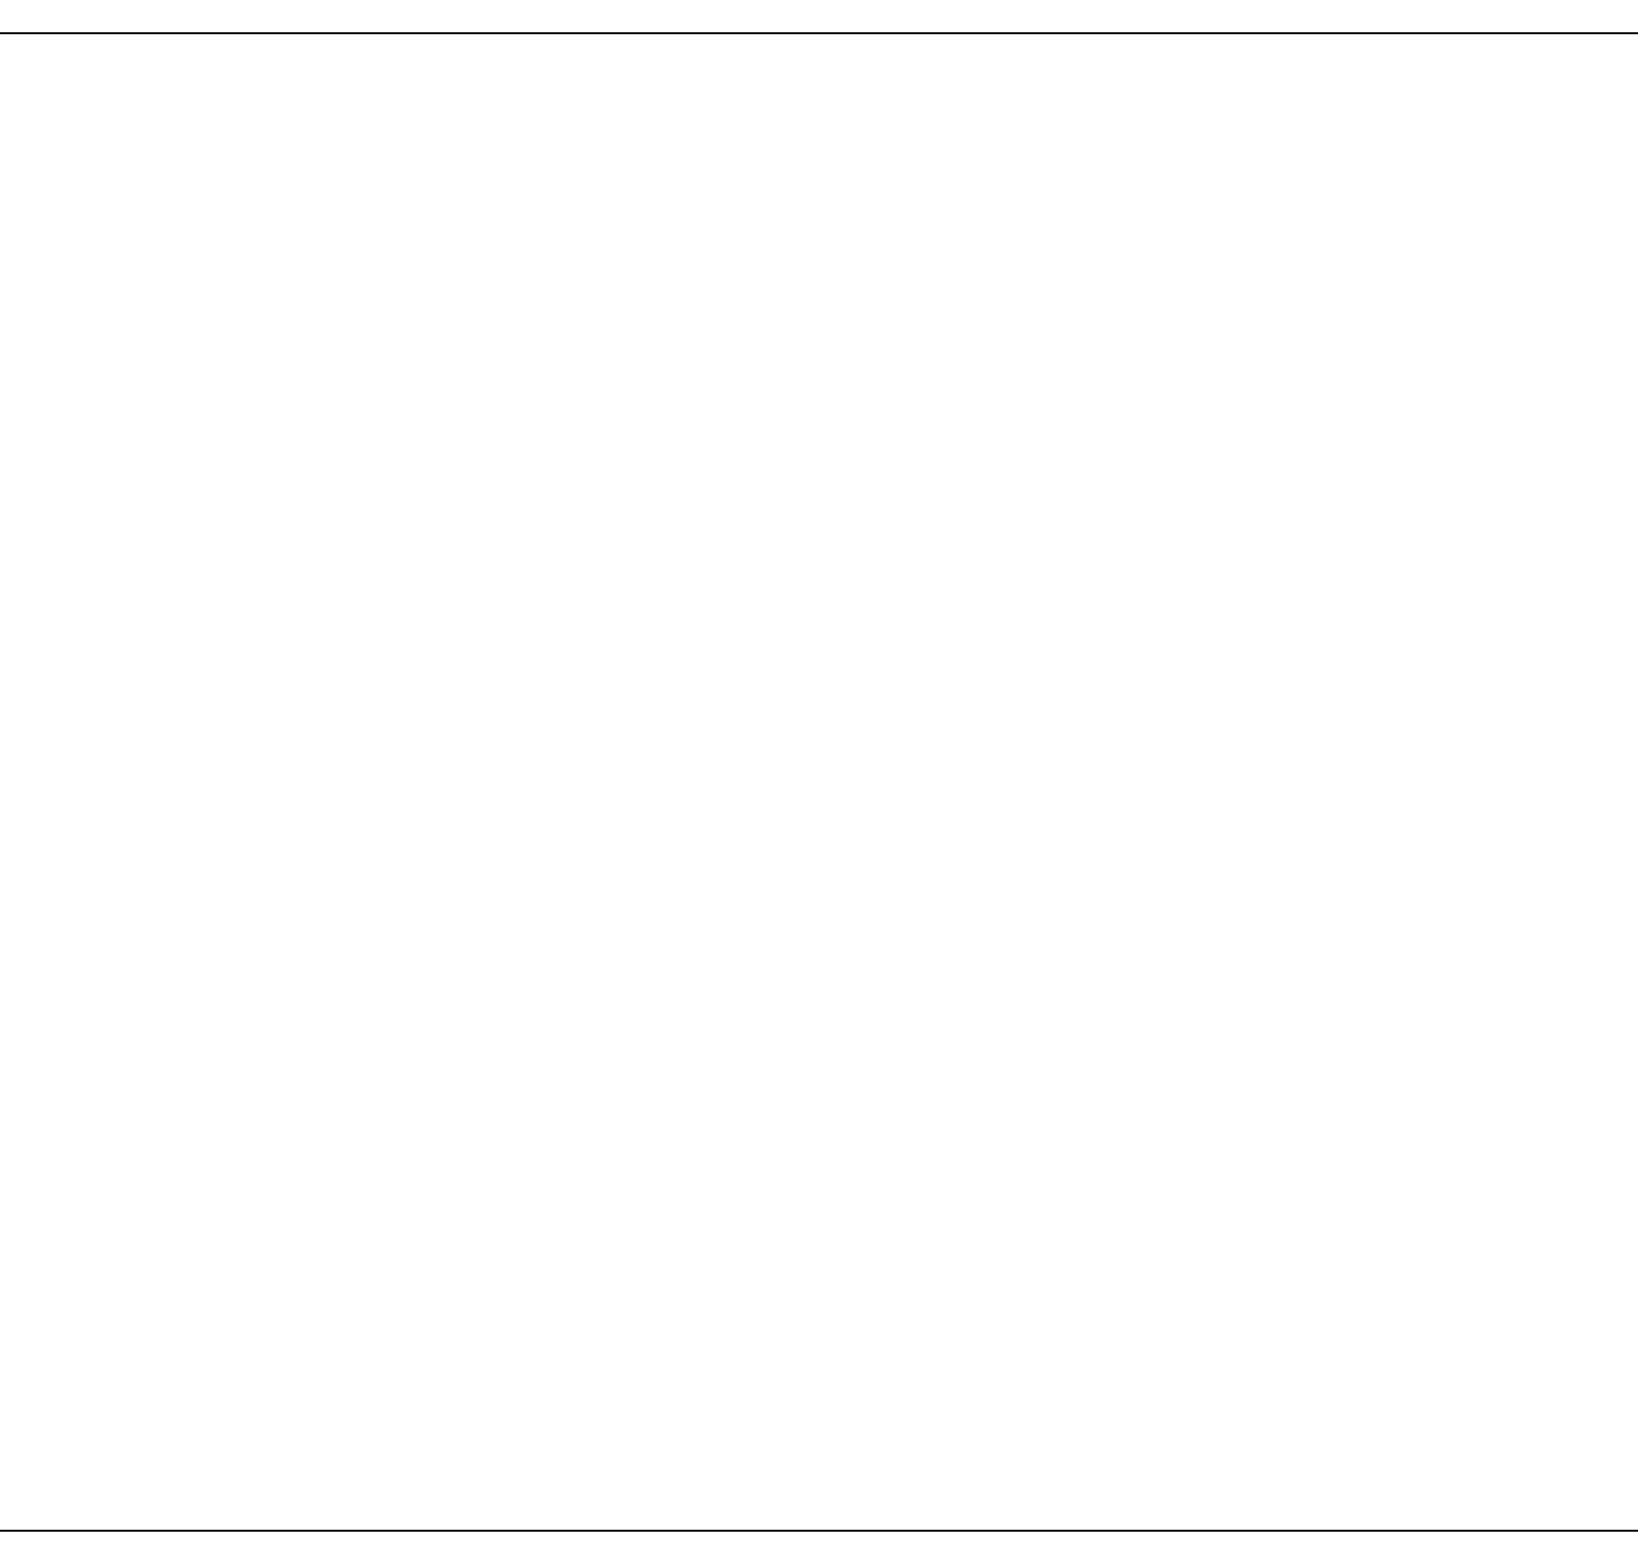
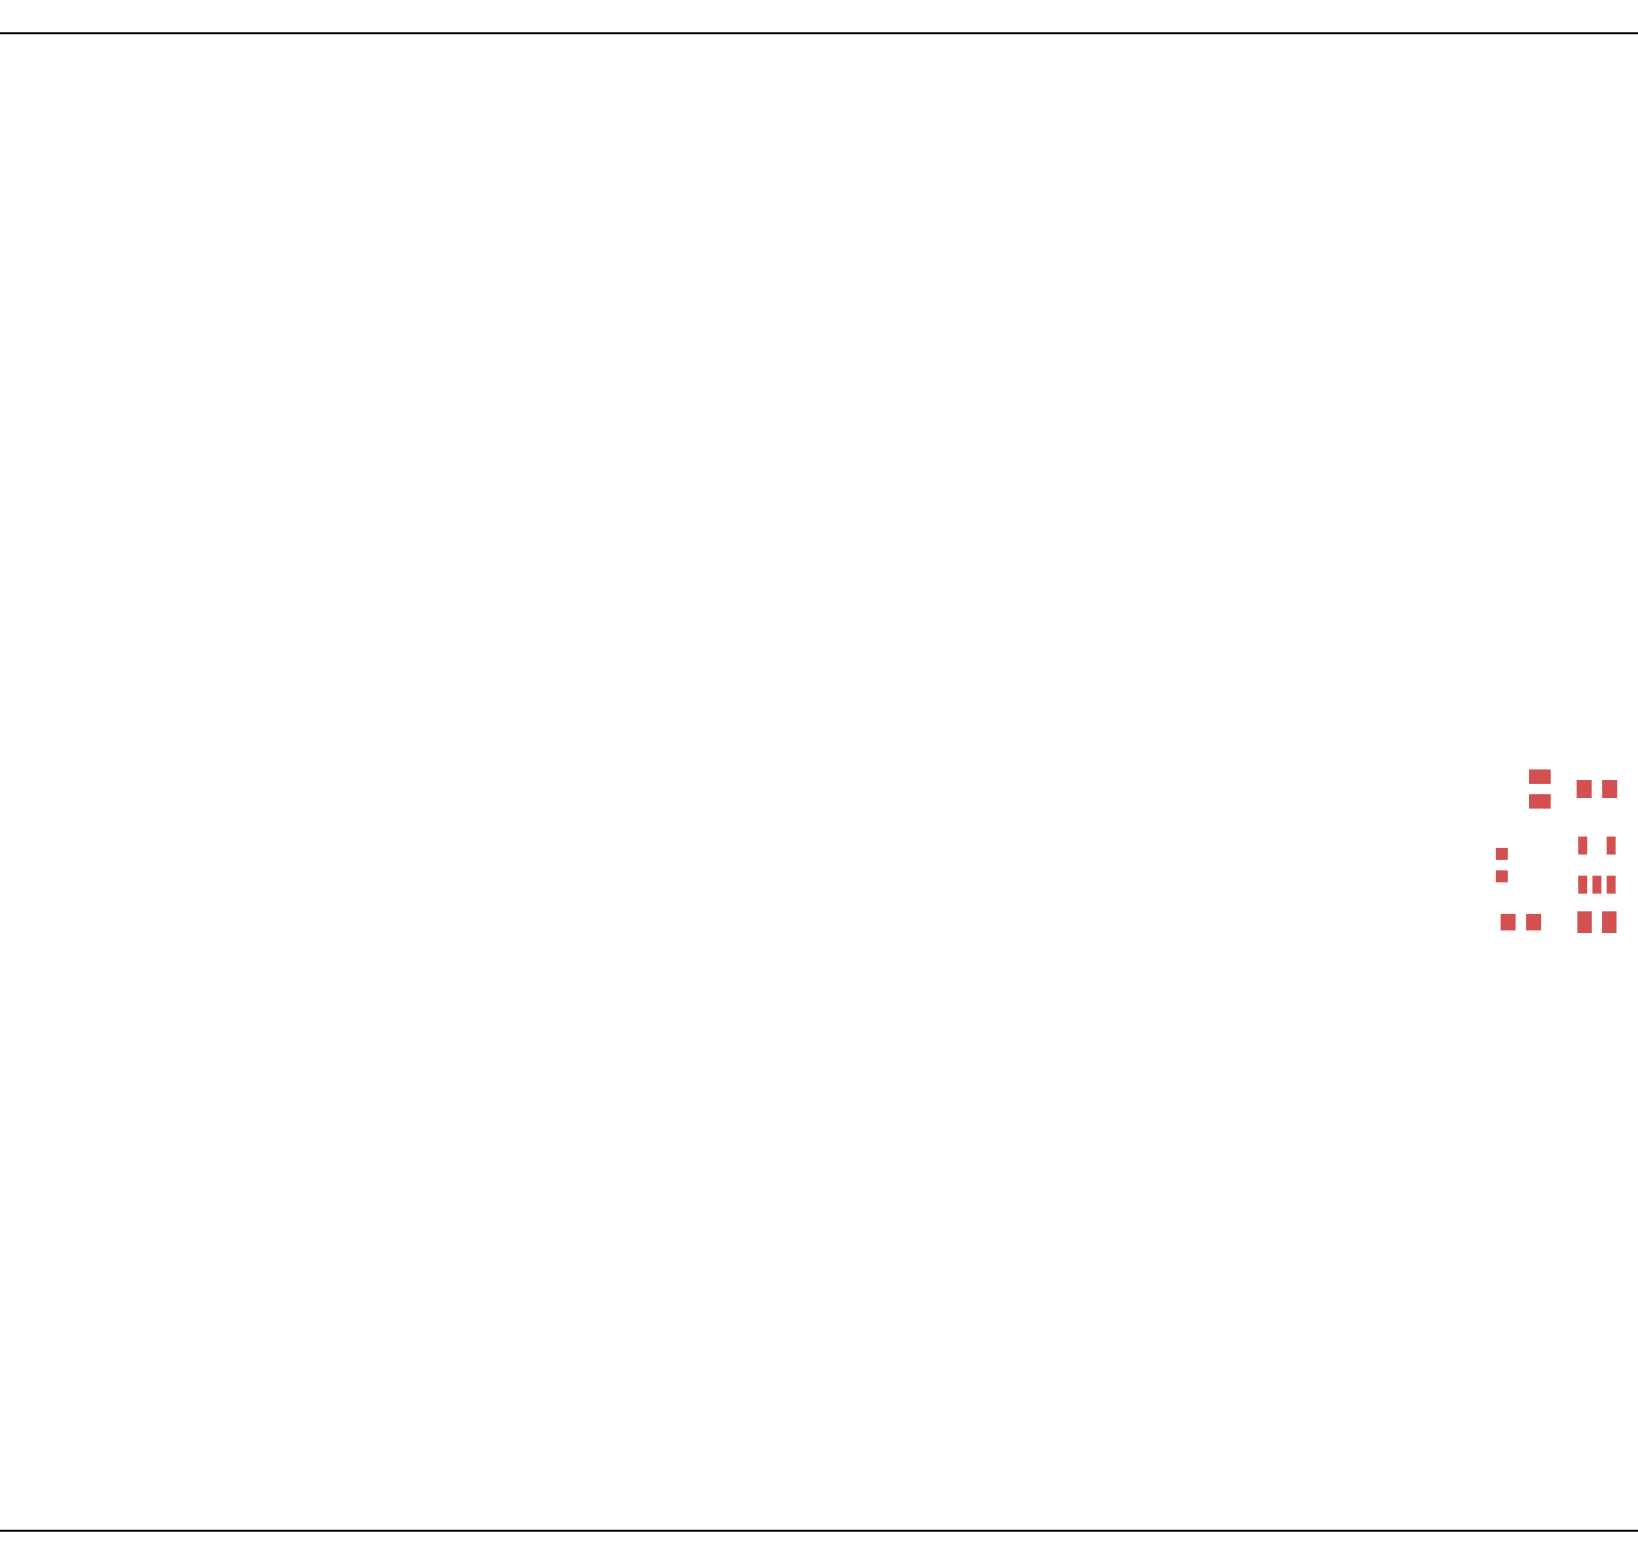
part: none -> (1539, 789)
part: none -> (1596, 789)
part: none -> (1501, 865)
part: none -> (1596, 865)
part: none -> (1520, 922)
part: none -> (1596, 922)

